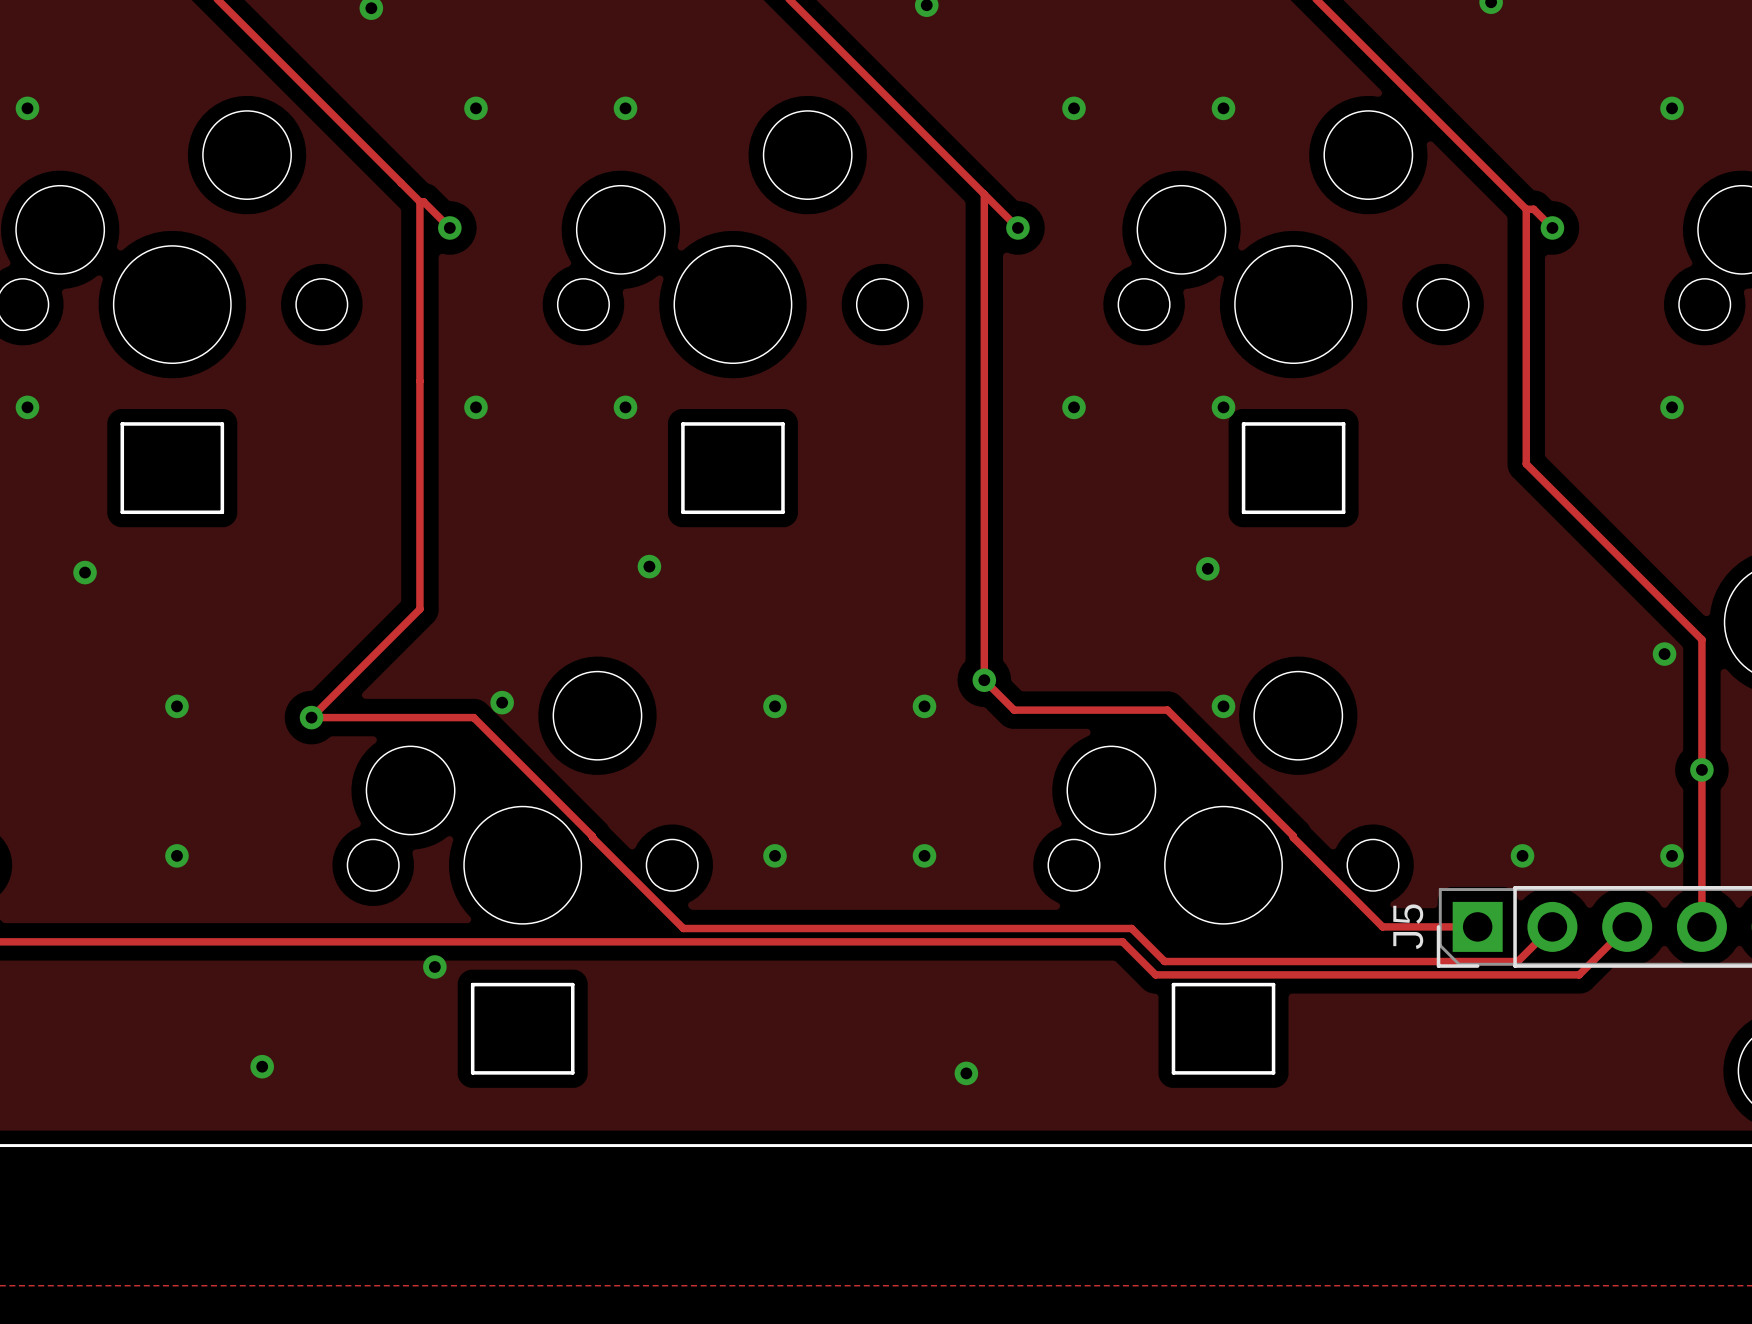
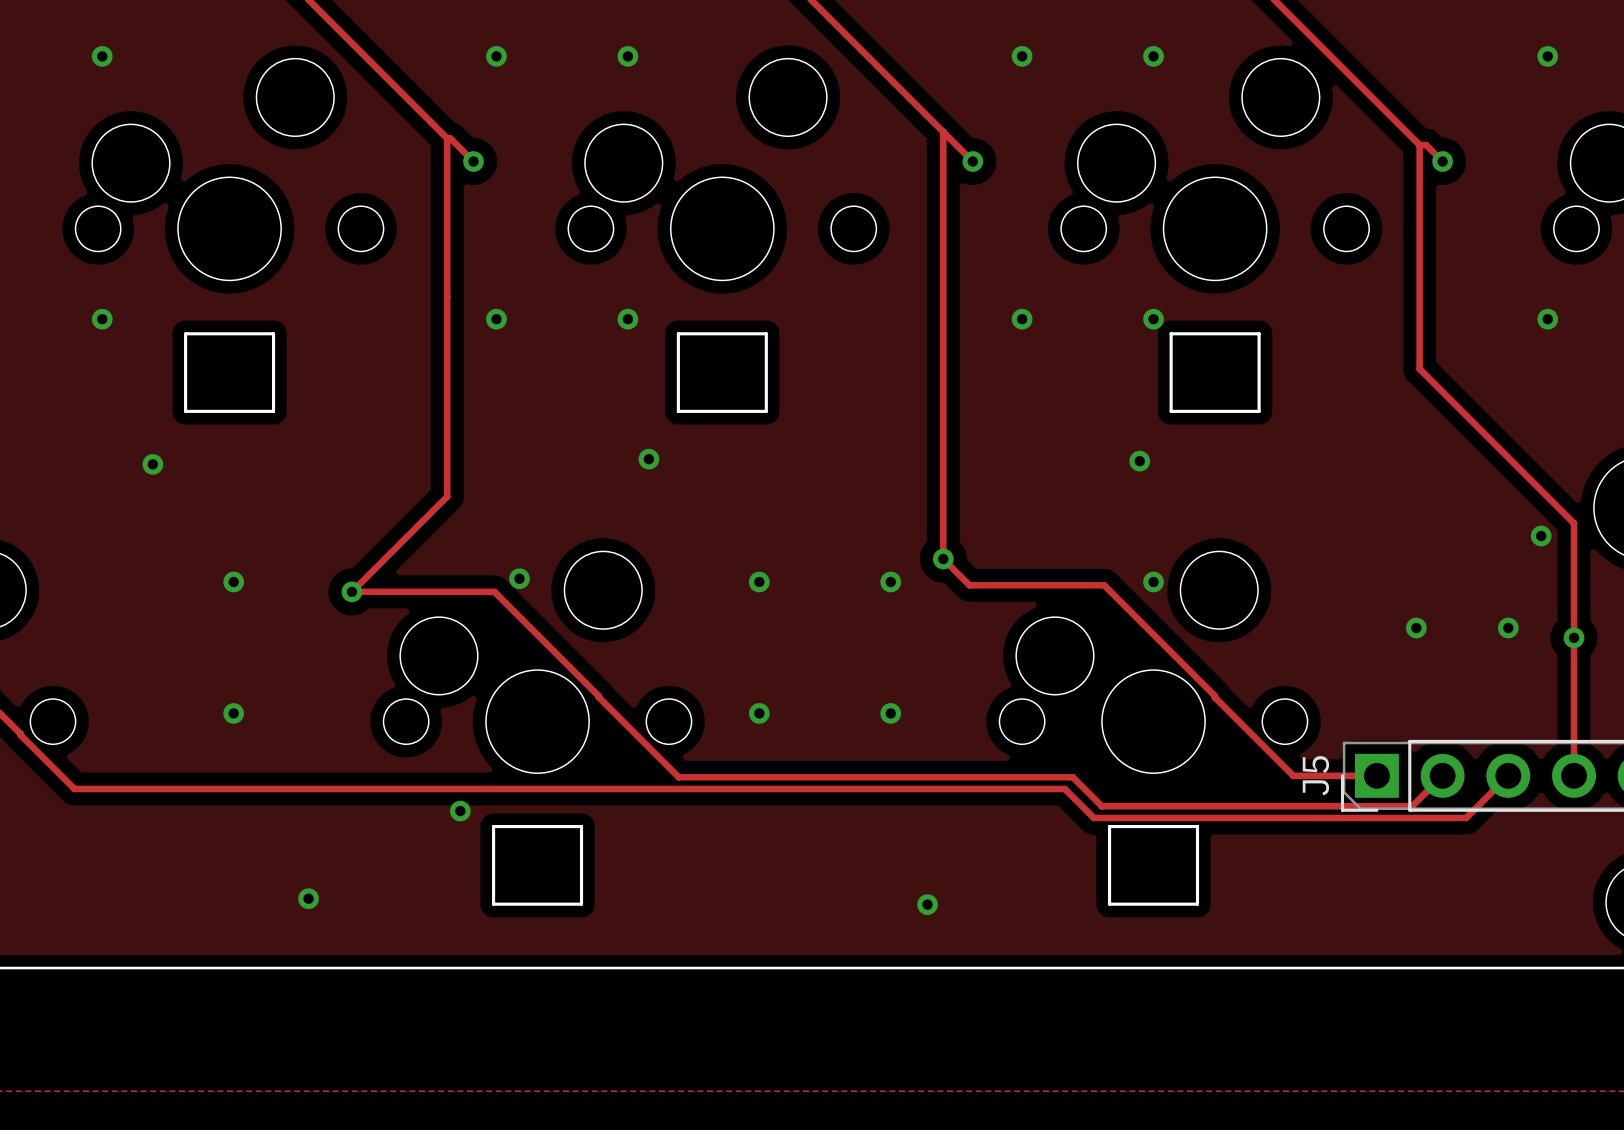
via: none -> (1416, 628)
via: none -> (1508, 628)
via: (1522, 855) -> none
via: (1672, 855) -> none

